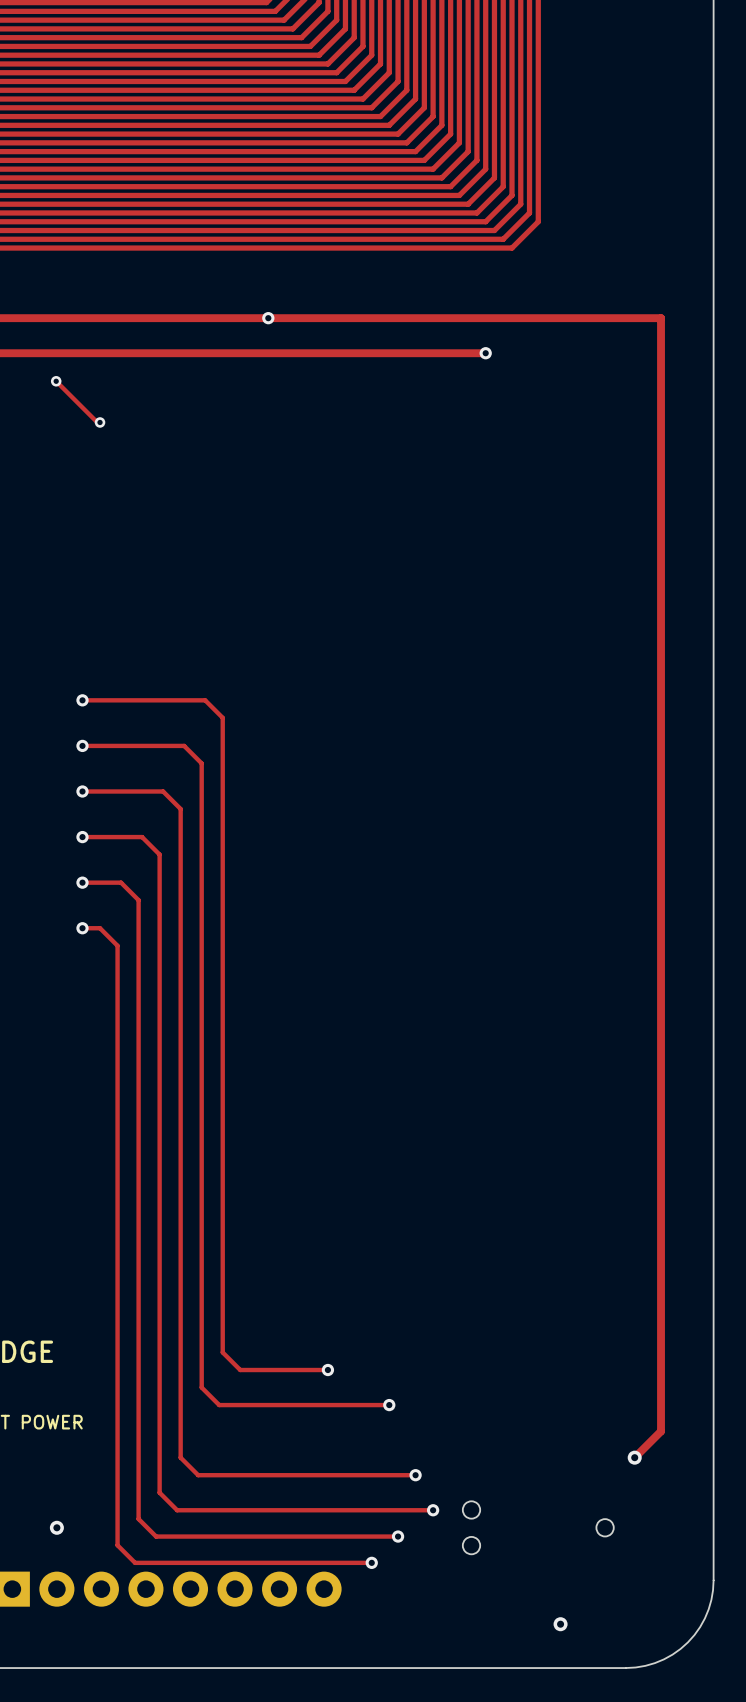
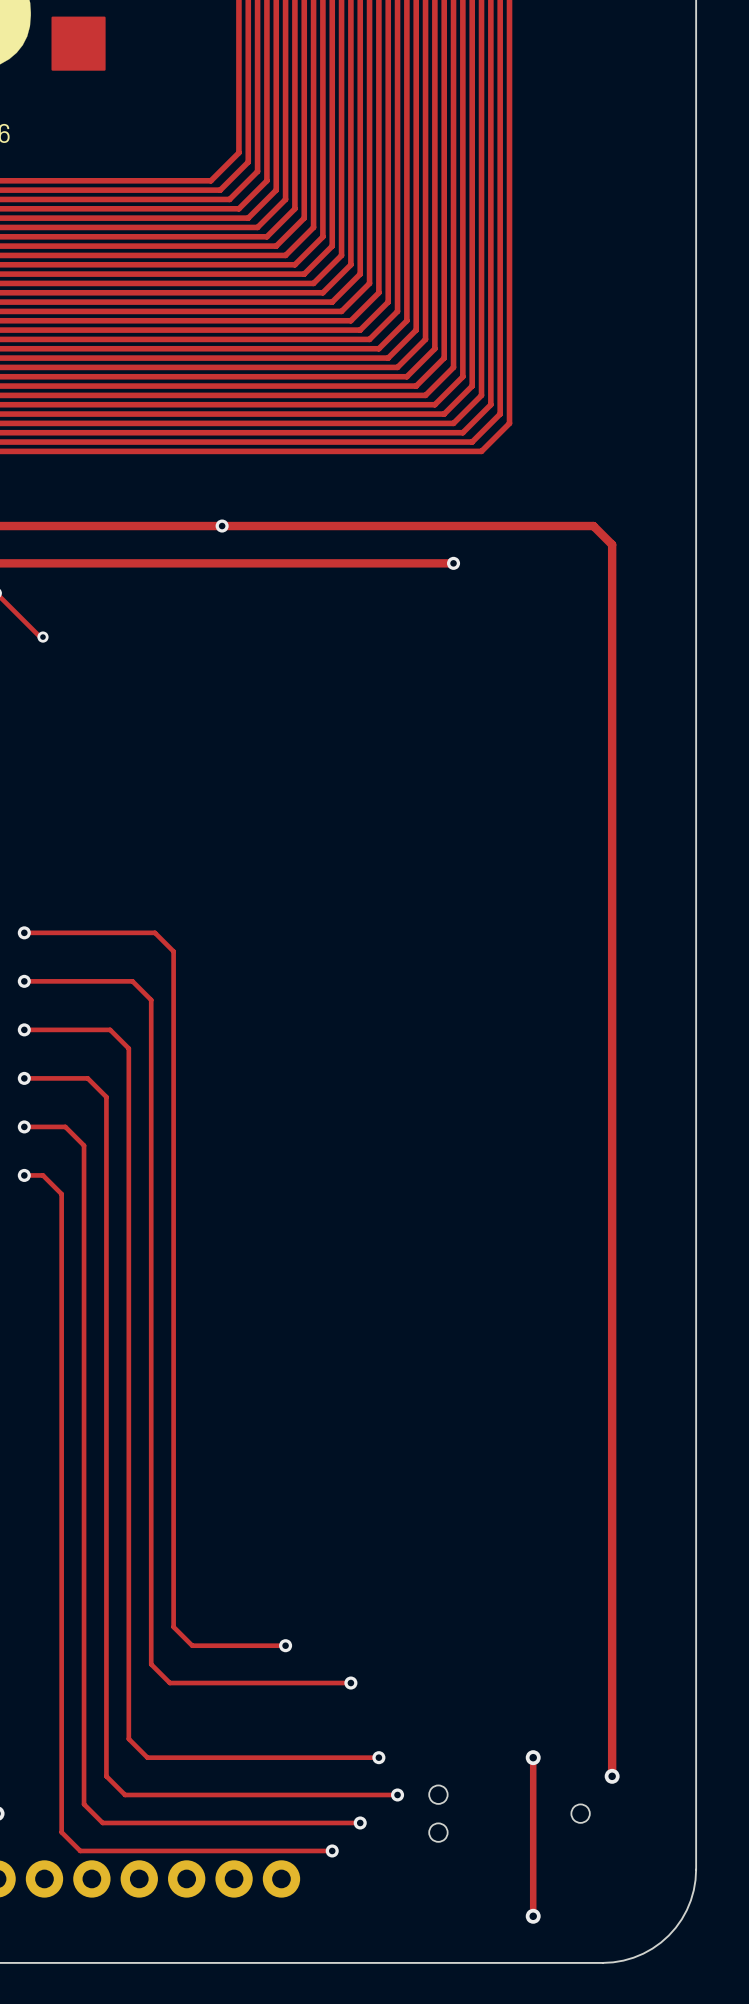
track: (617, 318) (661, 318) (661, 1431) (634, 1457) -> (593, 526) (612, 544) (612, 1776)
via position: (634, 1457) -> (612, 1776)
track: none -> (533, 1757) (533, 1911)
via: none -> (533, 1757)

